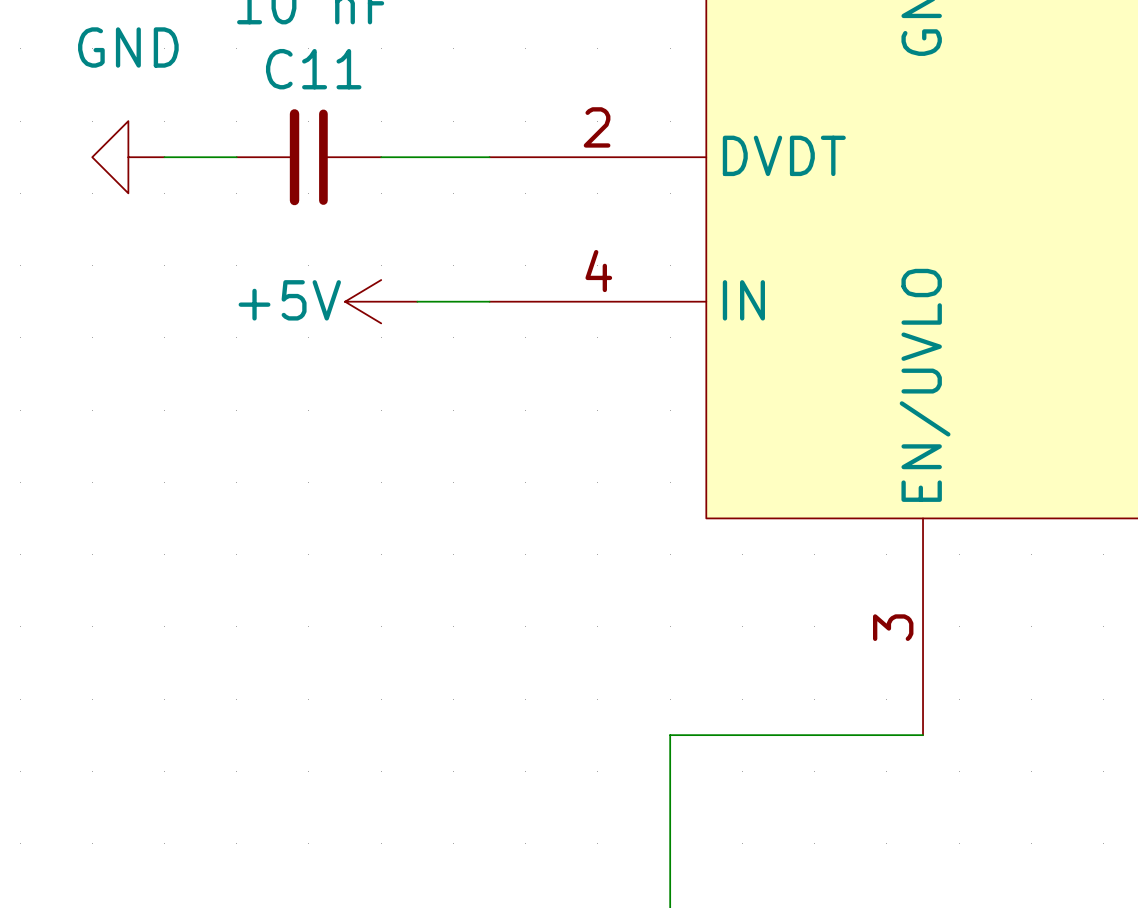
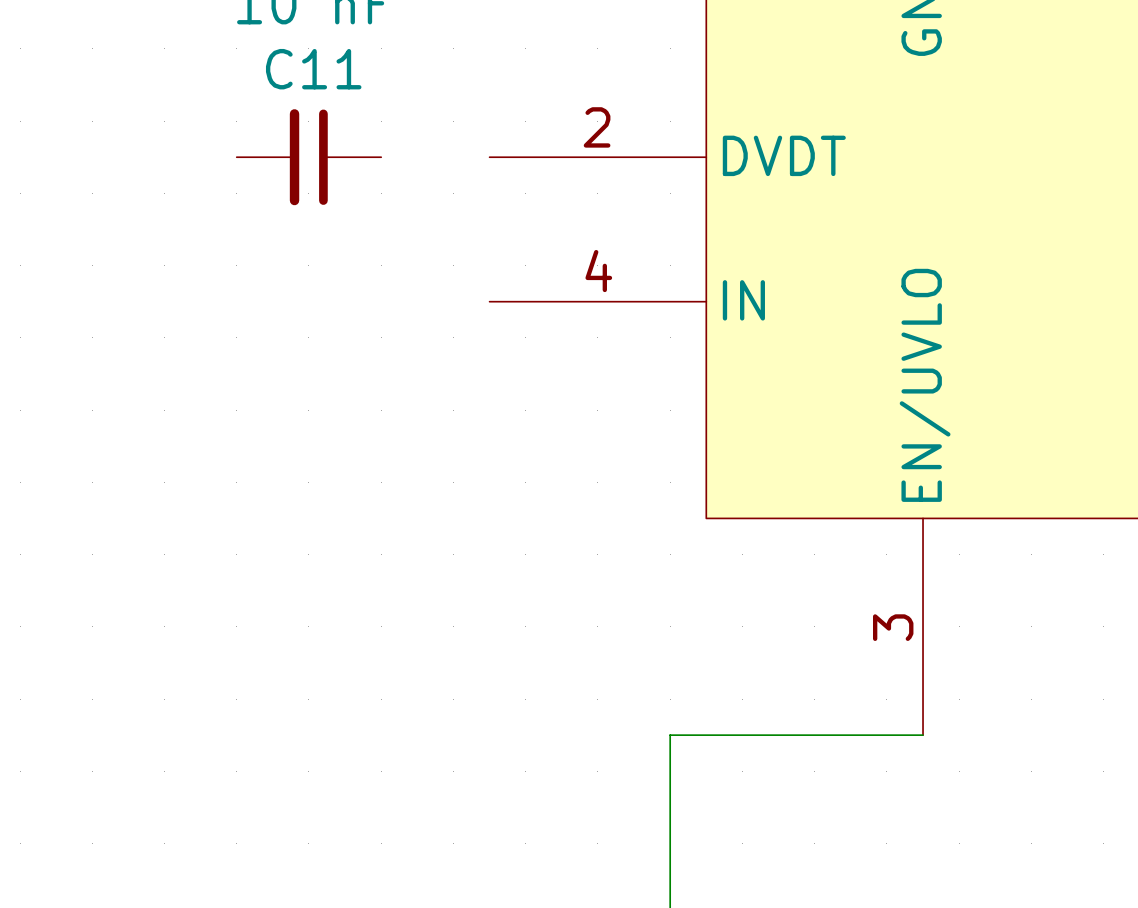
power symbol: GND (128, 157) -> none
wire: (164, 157) (236, 157) -> none
wire: (381, 157) (489, 157) -> none
power symbol: +5V (381, 301) -> none
wire: (417, 301) (489, 301) -> none

